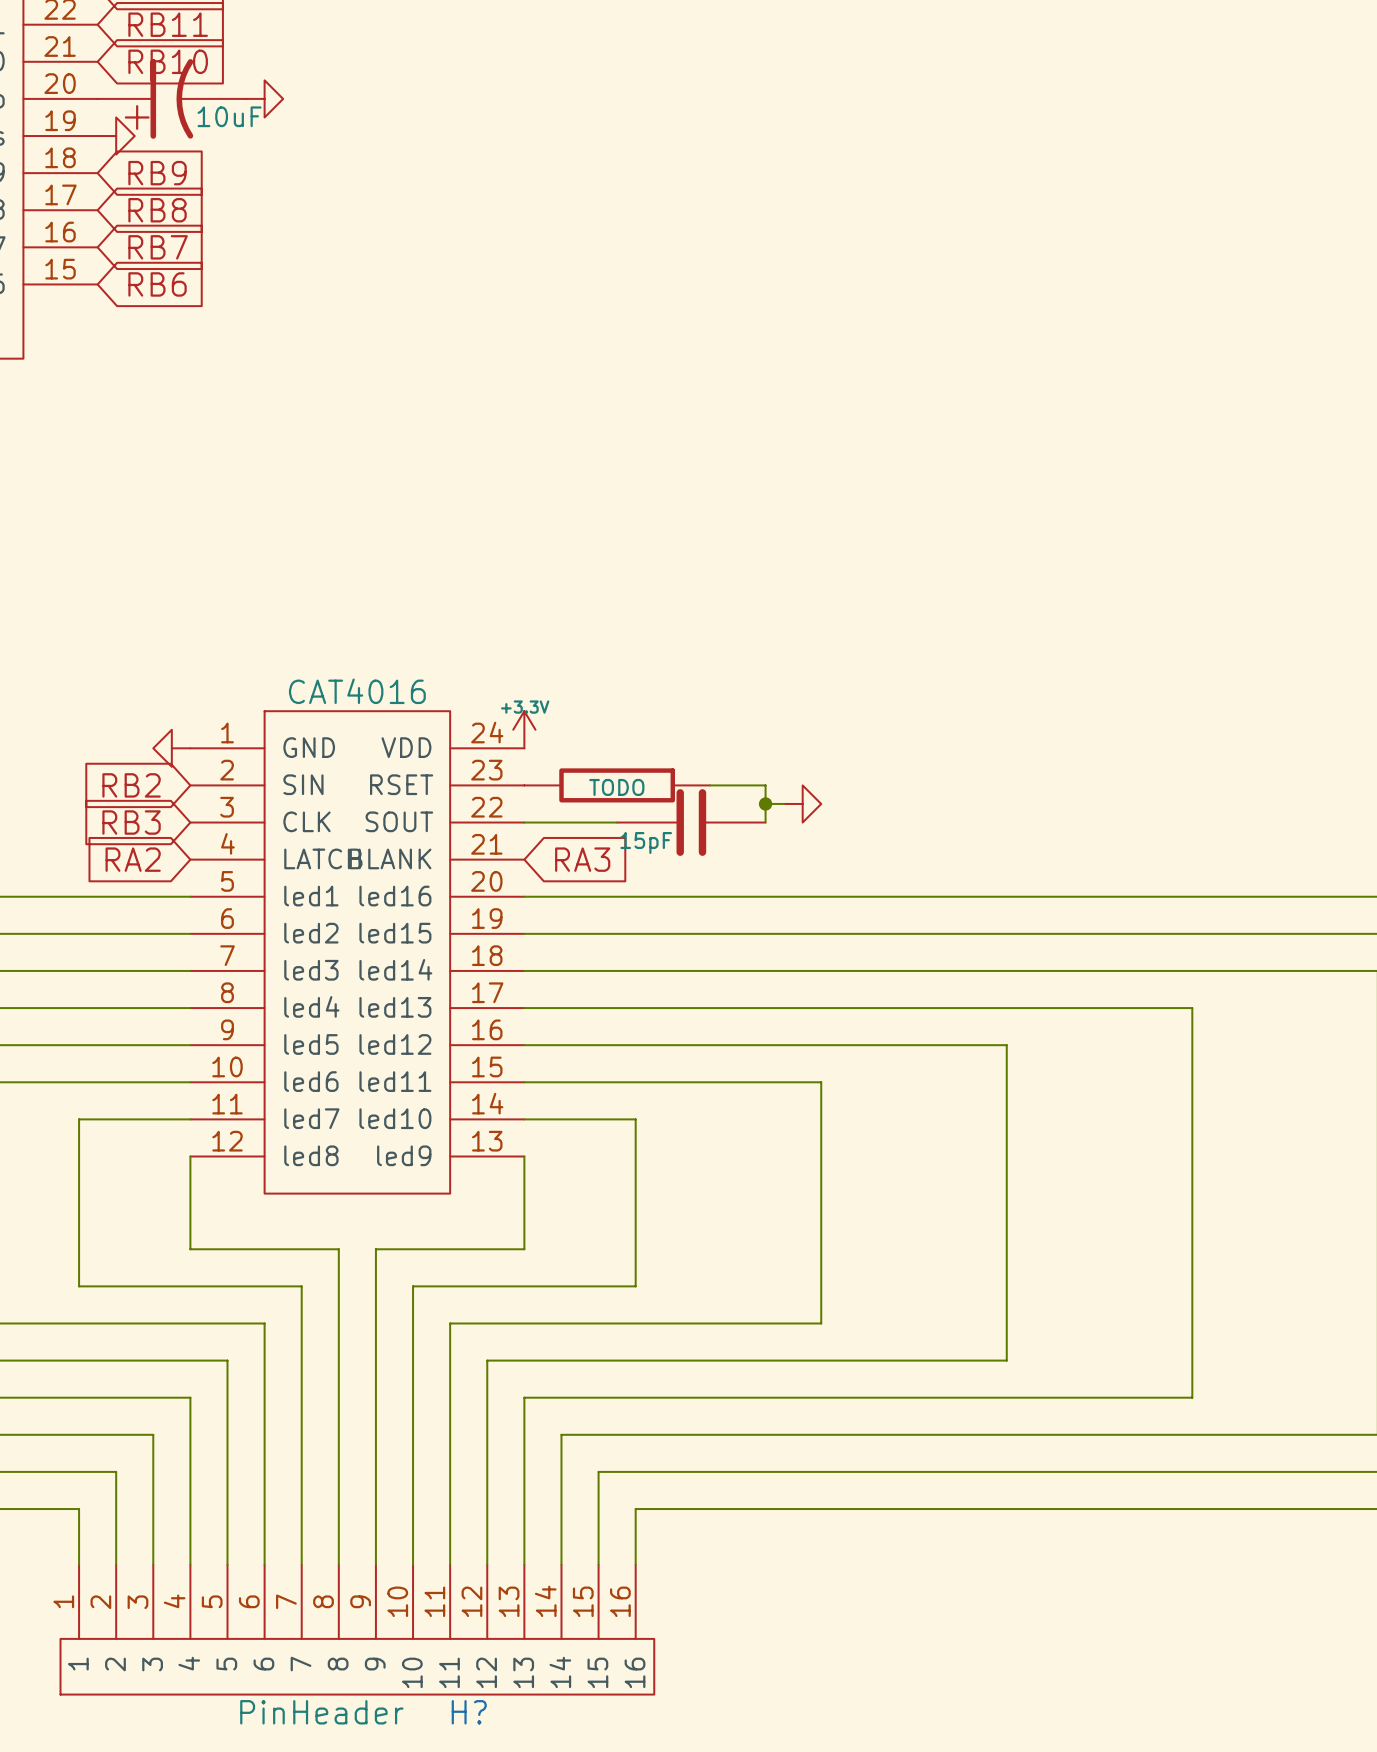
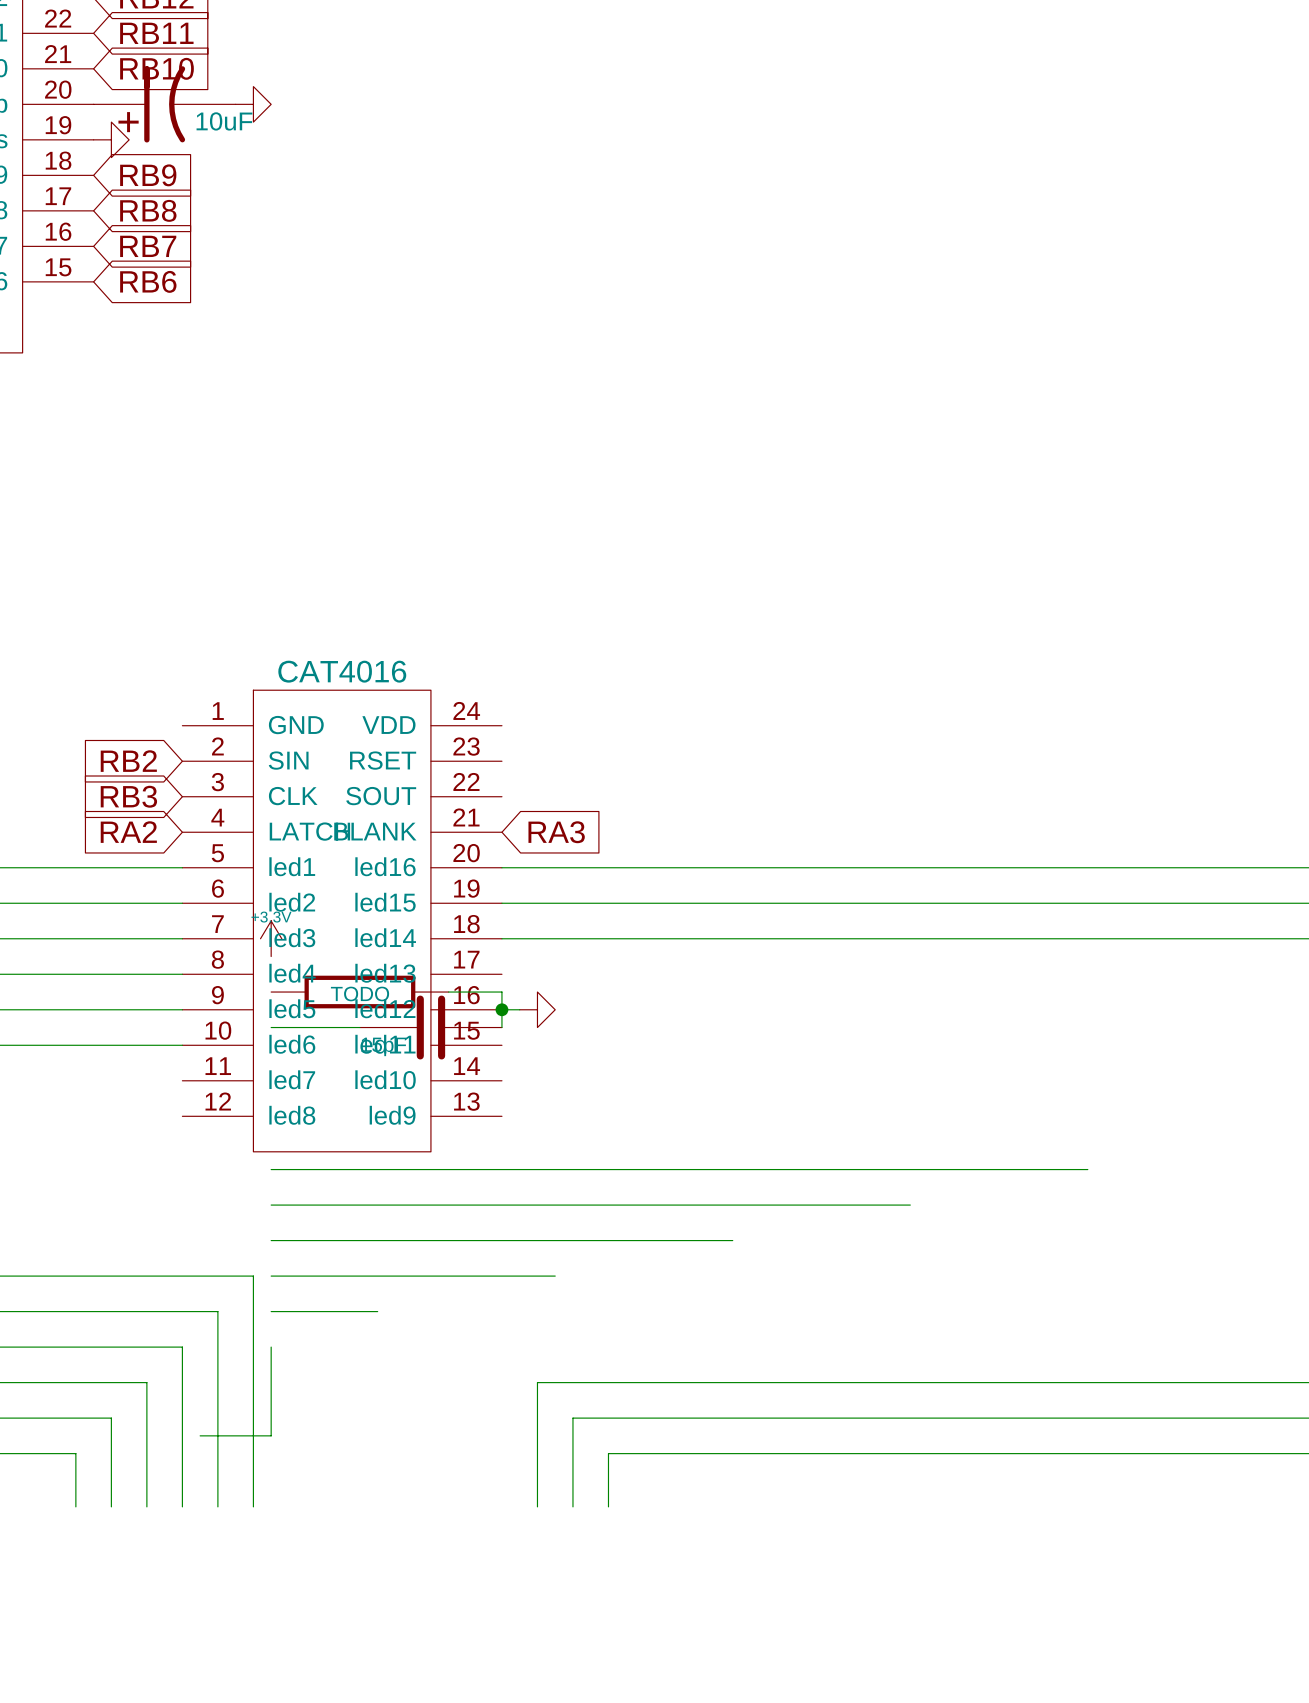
power symbol position: +3.3V (524, 729) -> +3.3V (271, 938)
power symbol: (171, 748) -> none
part position: (617, 785) -> (359, 992)
wire: (709, 785) (765, 785) (765, 822) -> (448, 992) (501, 992) (501, 1027)
wire: (765, 803) (784, 803) -> none
junction: (765, 803) -> none
power symbol: (802, 803) -> none
wire: (524, 822) (617, 822) -> (271, 1027) (359, 1027)
part position: (691, 822) -> (430, 1027)
wire: (524, 1008) (1192, 1008) (1192, 1397) (524, 1397) (524, 1564) -> none
junction: none -> (501, 1009)
wire: (542, 1045) (1006, 1045) (1006, 1360) (487, 1360) (487, 1564) -> none
power symbol: none -> (537, 1009)
wire: (524, 1082) (821, 1082) (821, 1323) (580, 1323) -> none
wire: (190, 1119) (79, 1119) (79, 1286) (283, 1286) -> none
wire: (524, 1119) (635, 1119) (635, 1286) -> (732, 1240) (608, 1240)
wire: (190, 1156) (190, 1249) (283, 1249) -> none
wire: (524, 1156) (524, 1249) -> (910, 1205) (501, 1205)
wire: none -> (271, 1169) (1087, 1169)
wire: (338, 1249) (338, 1564) -> (324, 1205) (359, 1205)
wire: (375, 1249) (375, 1564) -> none
wire: (301, 1286) (301, 1564) -> (288, 1240) (395, 1240)
wire: (413, 1286) (413, 1564) -> none
wire: (450, 1323) (450, 1564) -> (430, 1276) (271, 1276)
wire: none -> (271, 1311) (377, 1311)
wire: none -> (271, 1347) (271, 1435) (200, 1435)
H?: PinHeader (357, 1629) -> none

